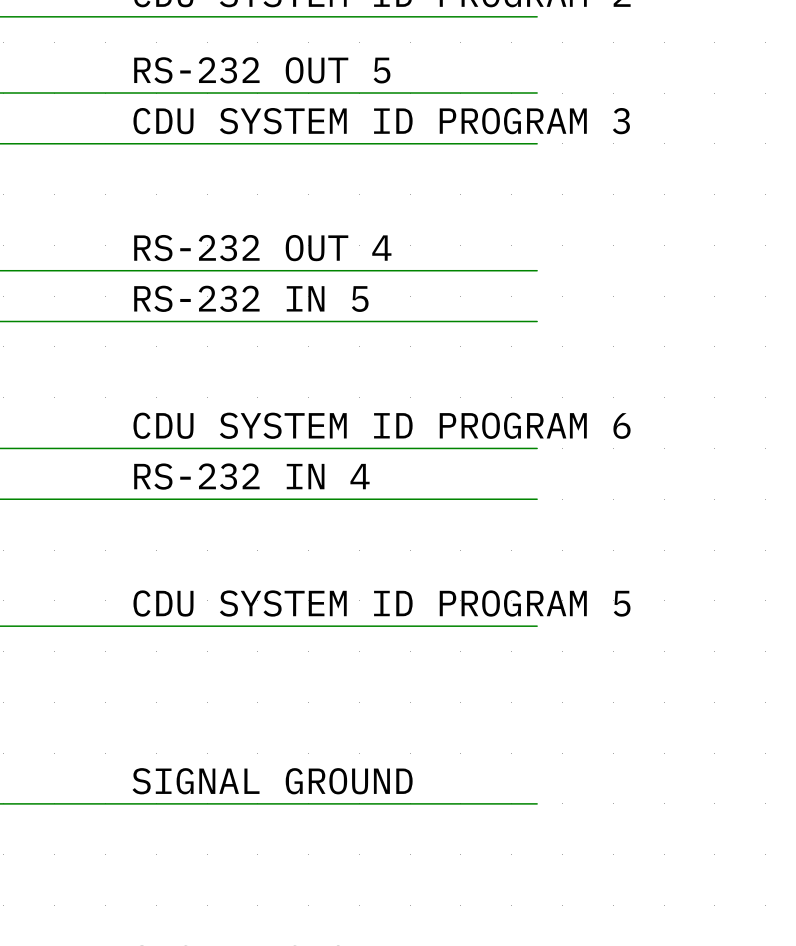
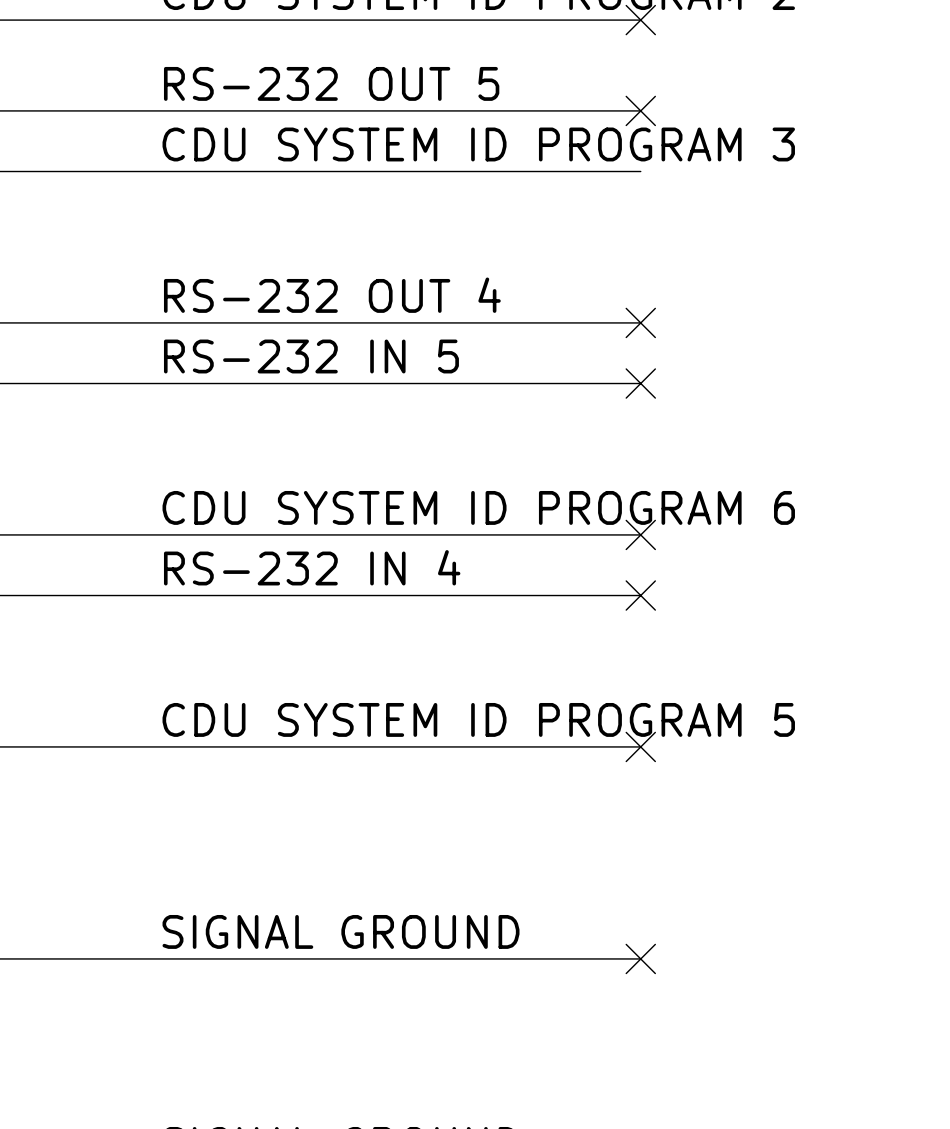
no-connect mark: none -> (640, 20)
no-connect mark: none -> (640, 110)
no-connect mark: none -> (640, 322)
no-connect mark: none -> (640, 383)
no-connect mark: none -> (640, 534)
no-connect mark: none -> (640, 595)
no-connect mark: none -> (640, 746)
no-connect mark: none -> (640, 958)

